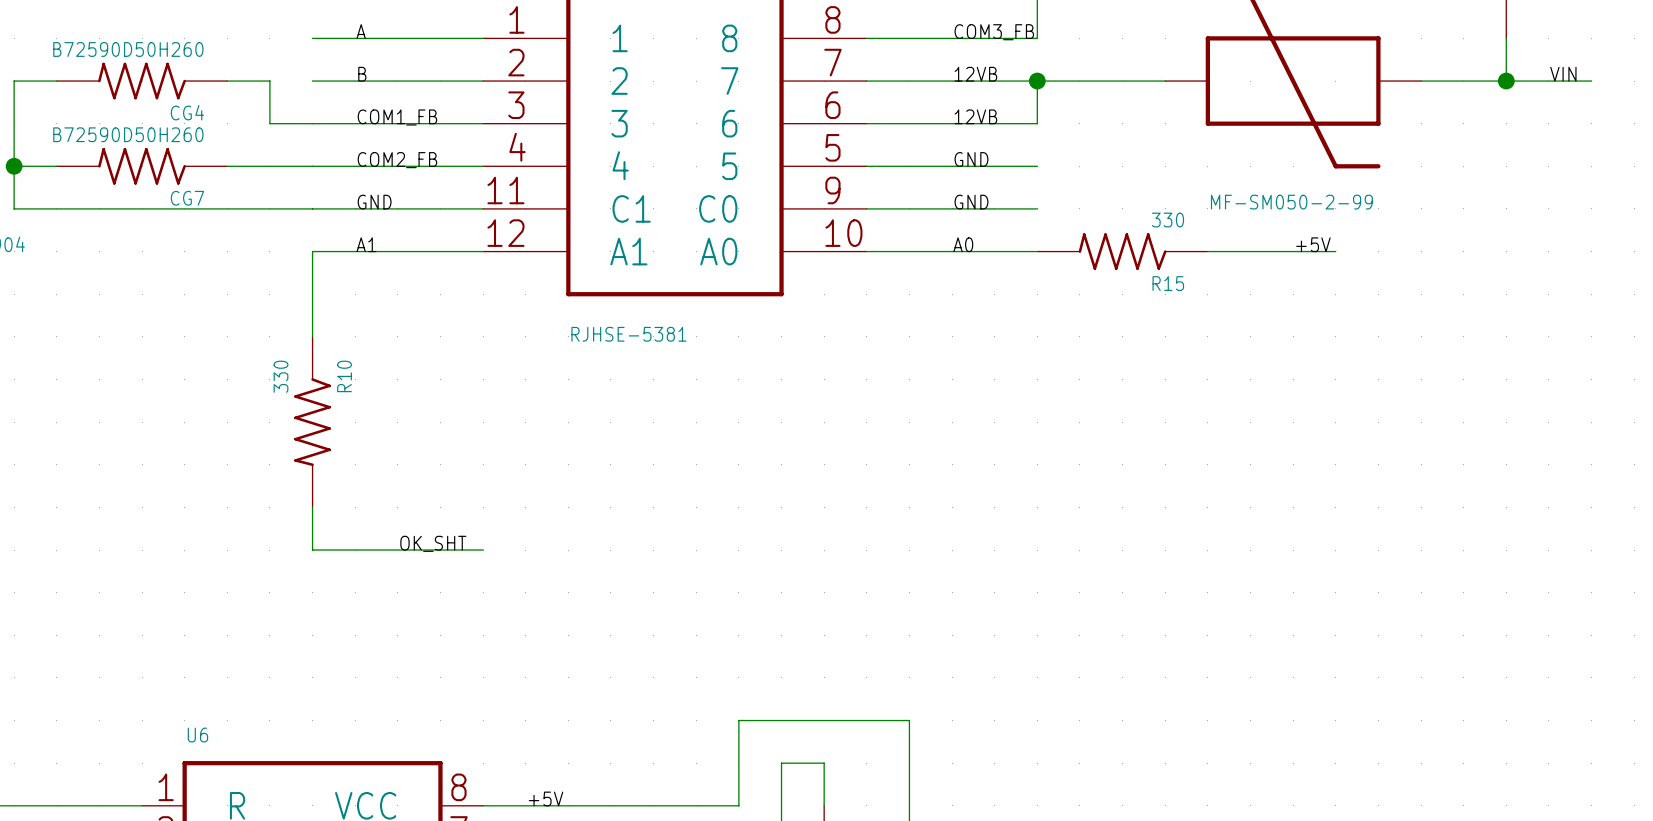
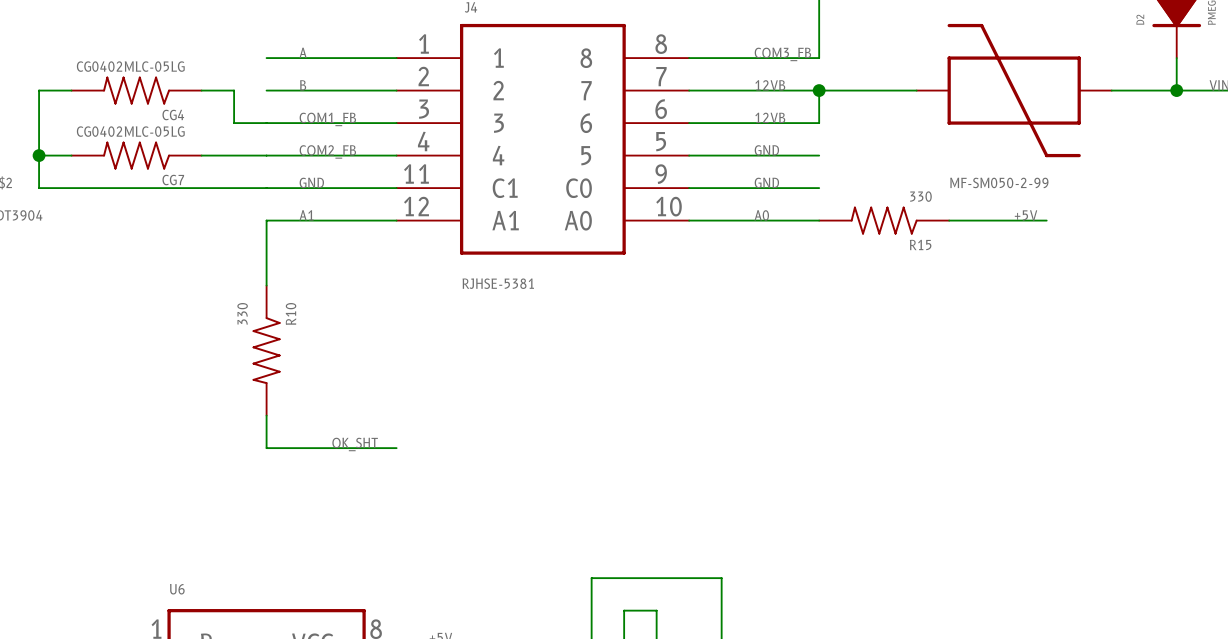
CG4 value: B72590D50H260 (128, 49) -> CG0402MLC-05LG (130, 66)
CG7 value: B72590D50H260 (128, 134) -> CG0402MLC-05LG (130, 131)

